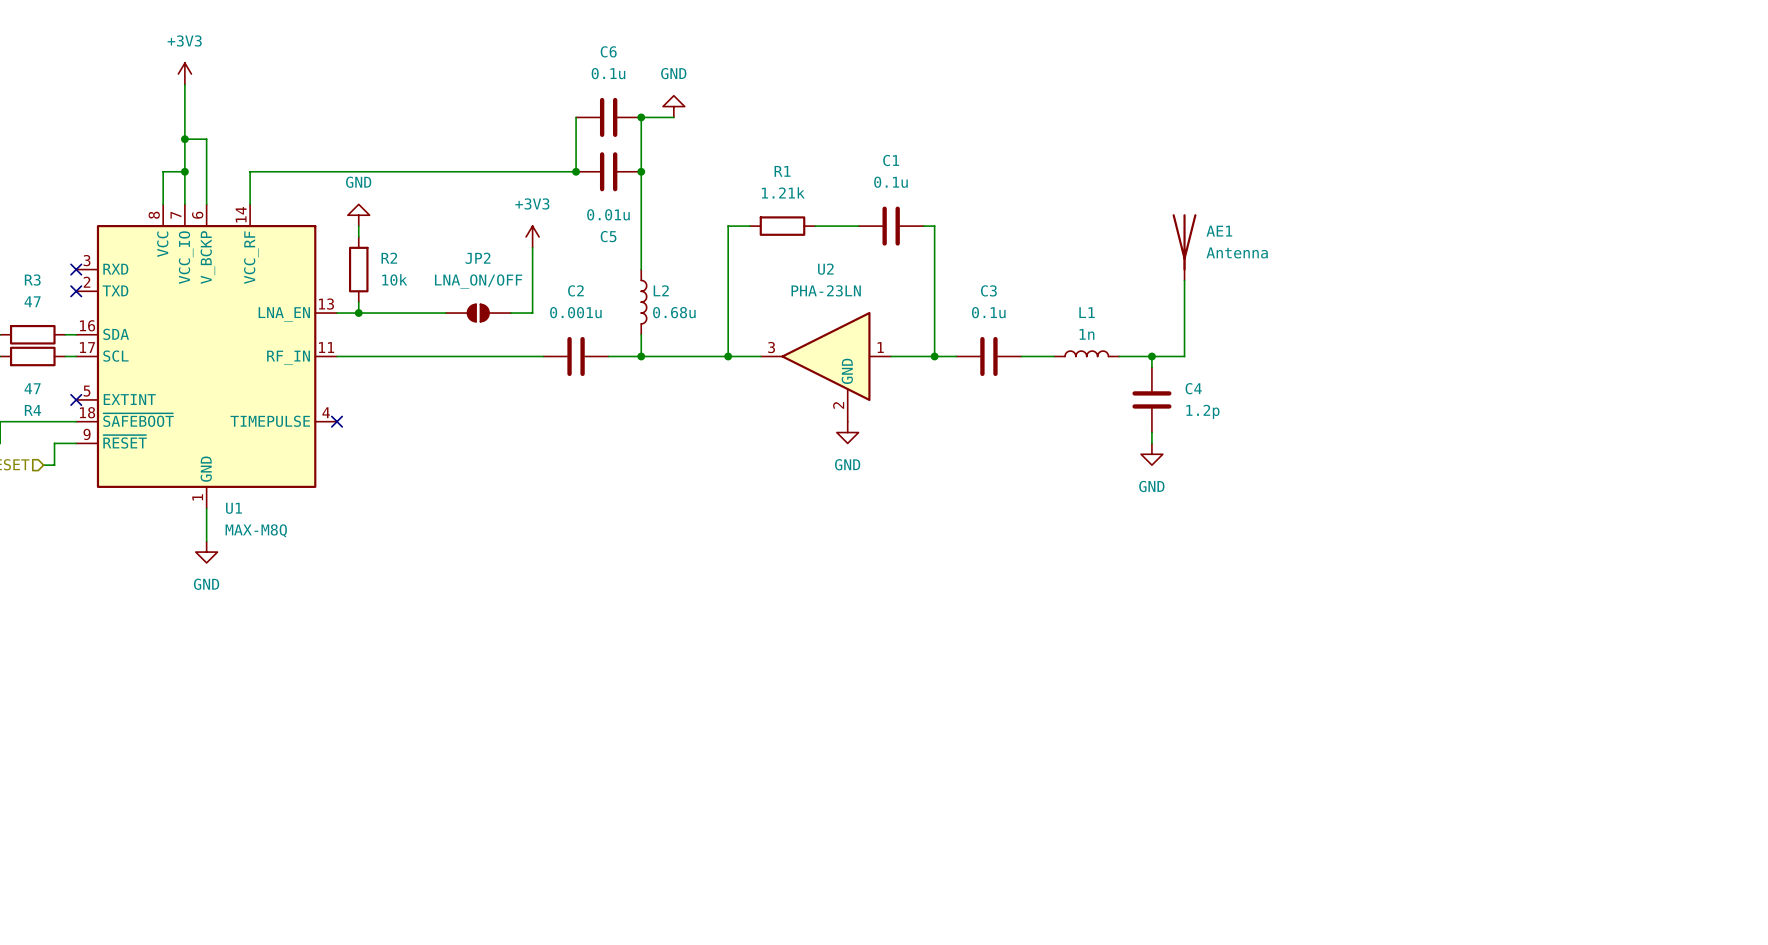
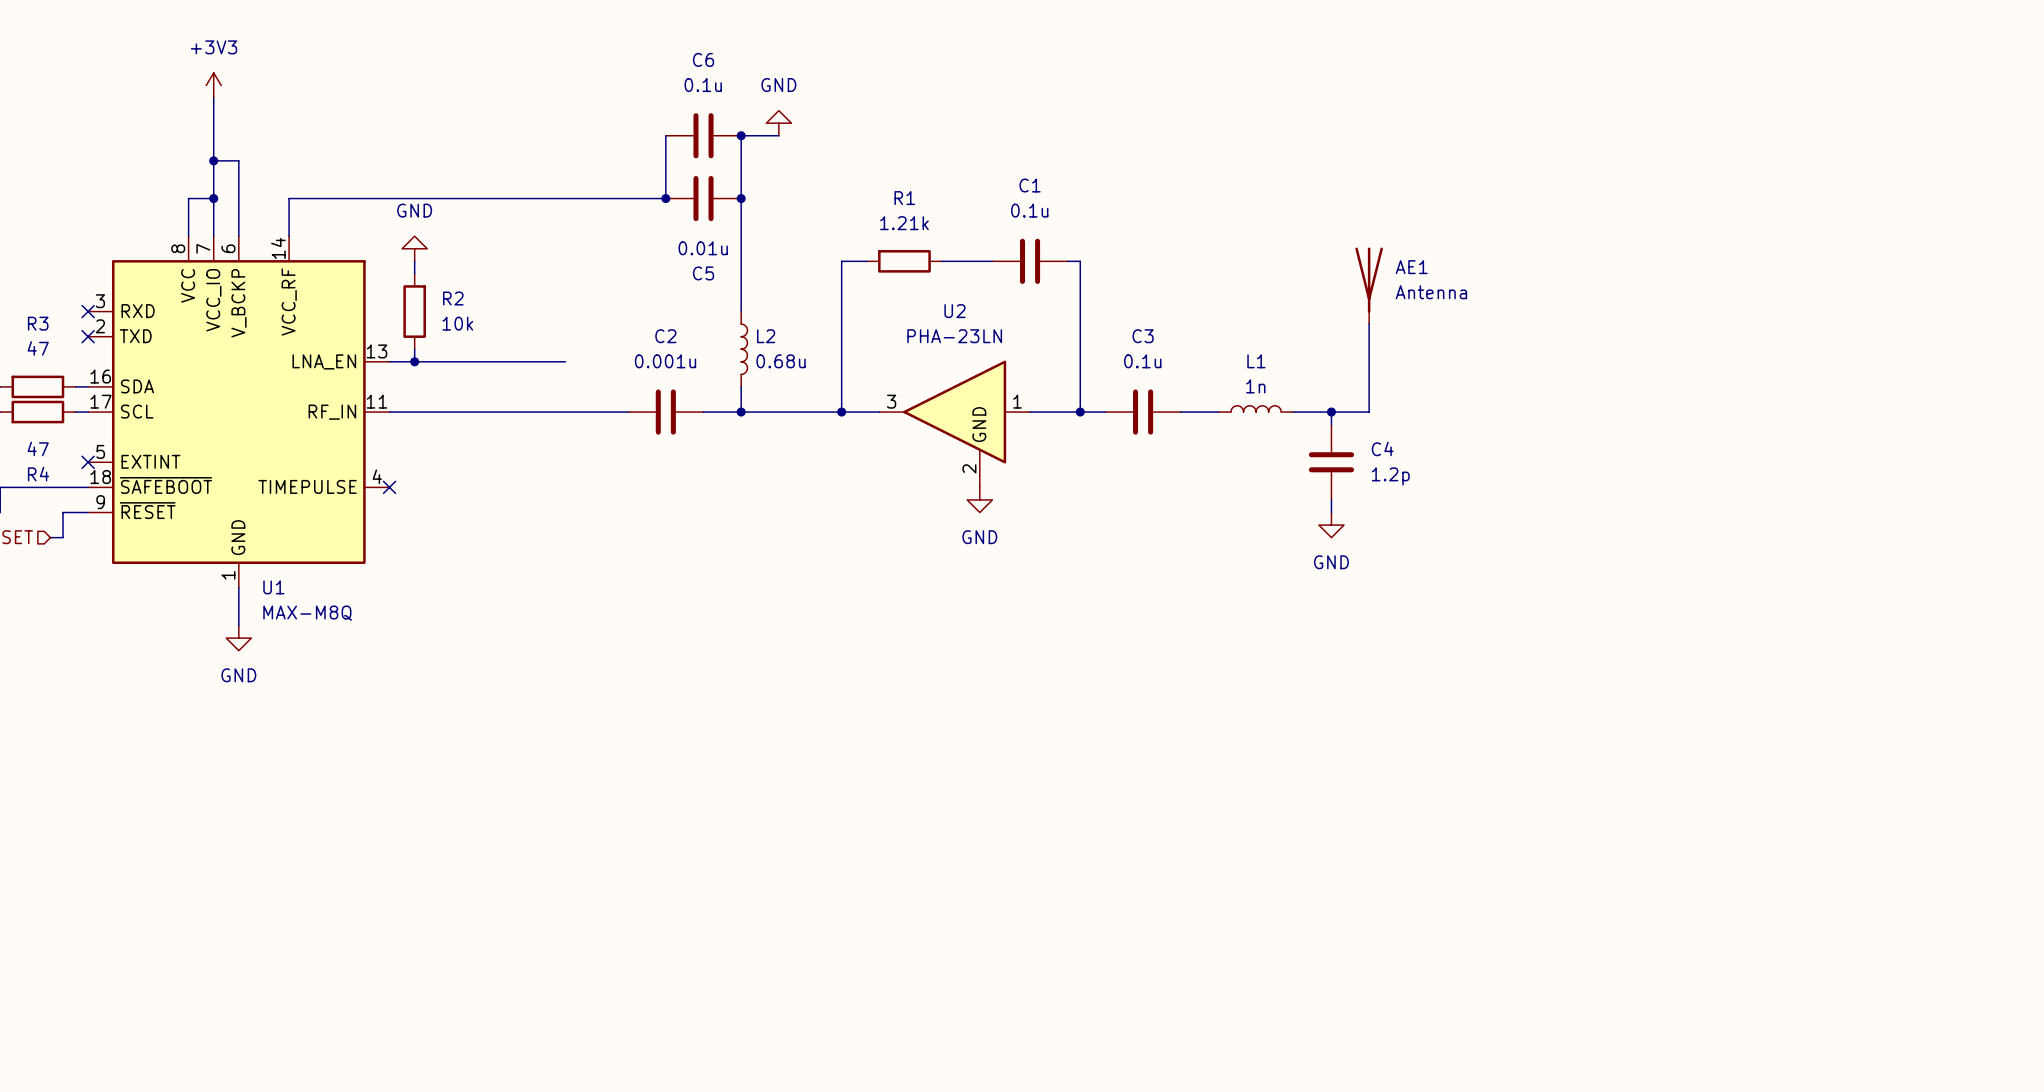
power symbol: +3V3 (532, 236) -> none
wire: (532, 247) (532, 313) (510, 313) -> none
JP2: LNA_ON/OFF (478, 313) -> none

